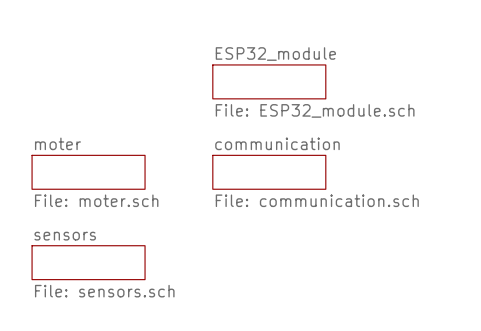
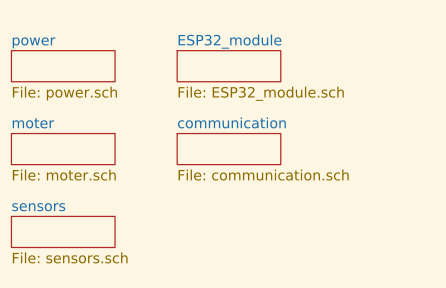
sheet power: none -> File: power.sch (63, 66)

